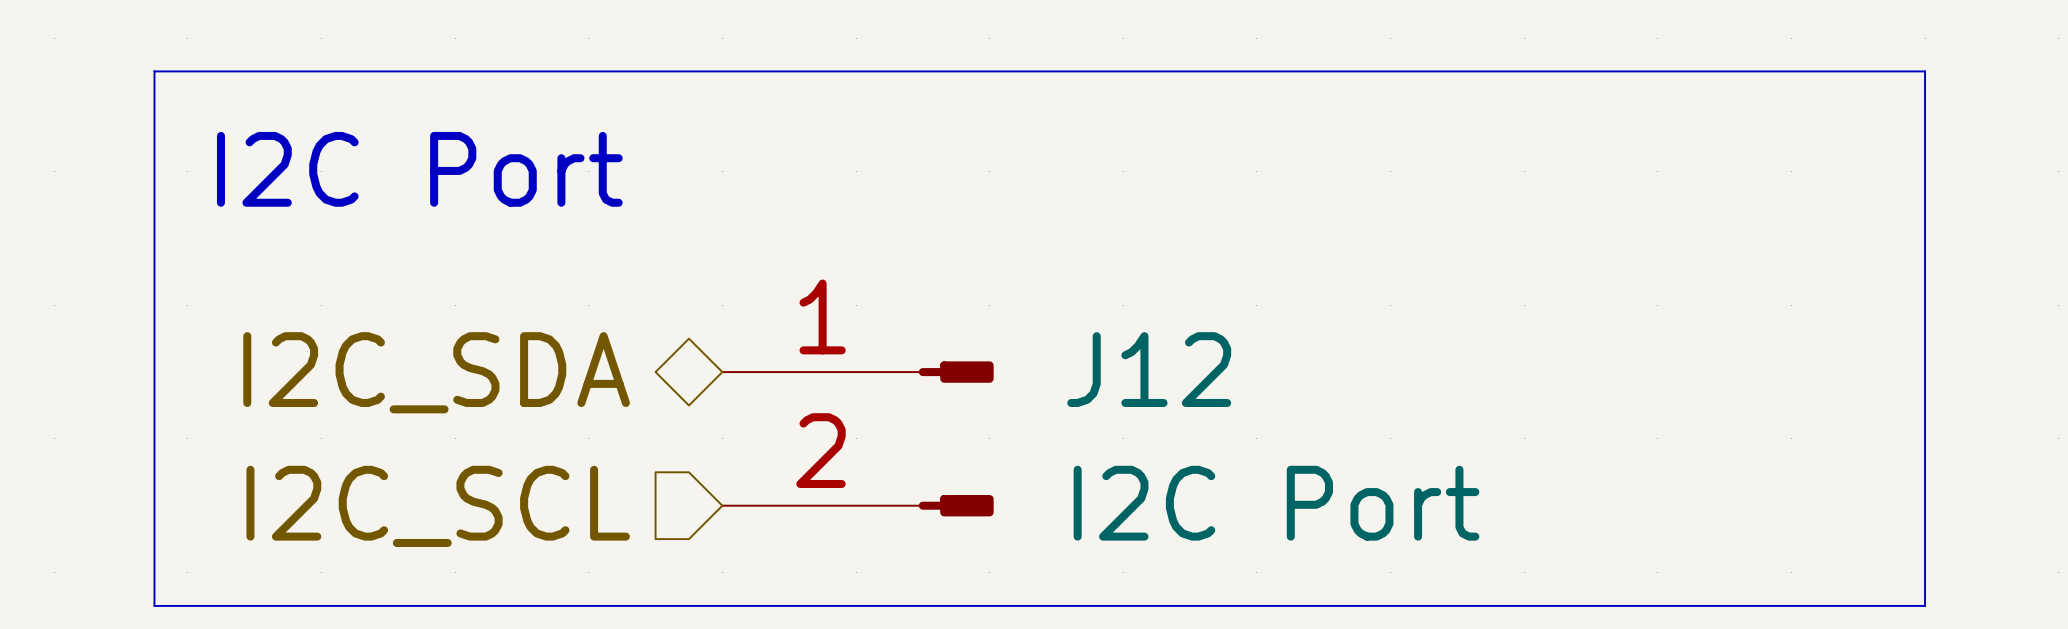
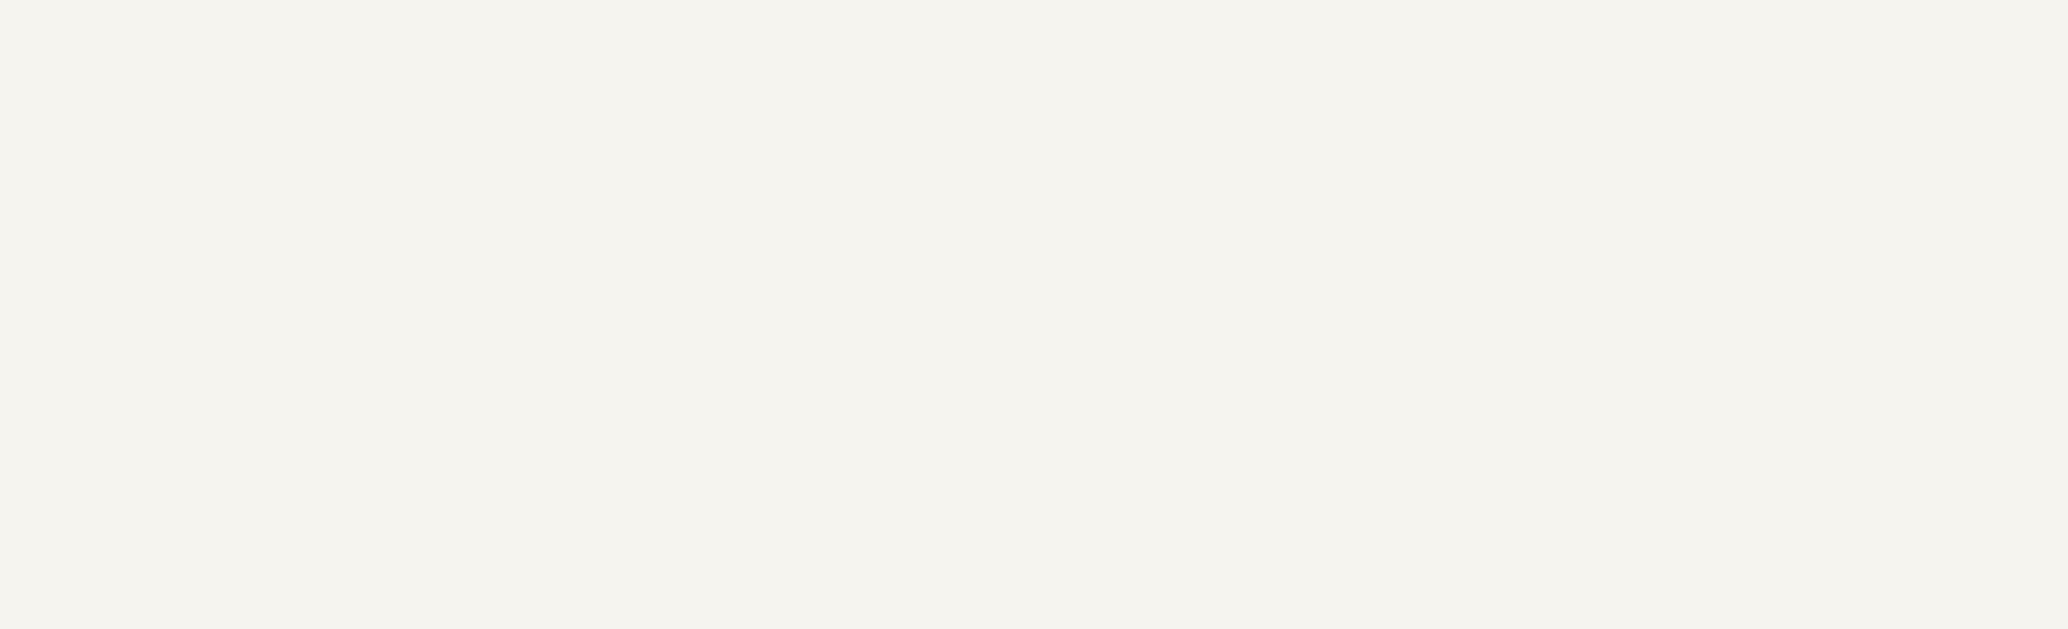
line: (154, 71) (1925, 71) (1925, 605) (154, 605) (154, 71) -> none
text: I2C Port (419, 169) -> none
hierarchical label: I2C_SDA (436, 372) -> none
J12: I2C Port (858, 438) -> none
hierarchical label: I2C_SCL (438, 506) -> none

